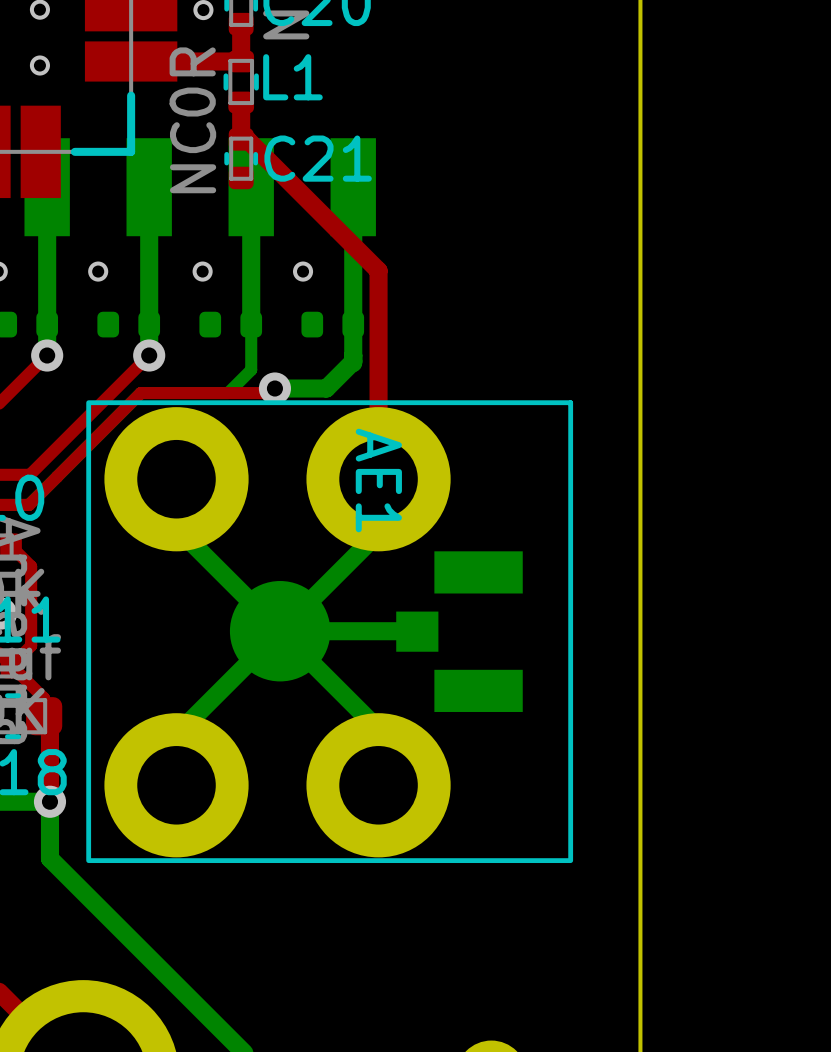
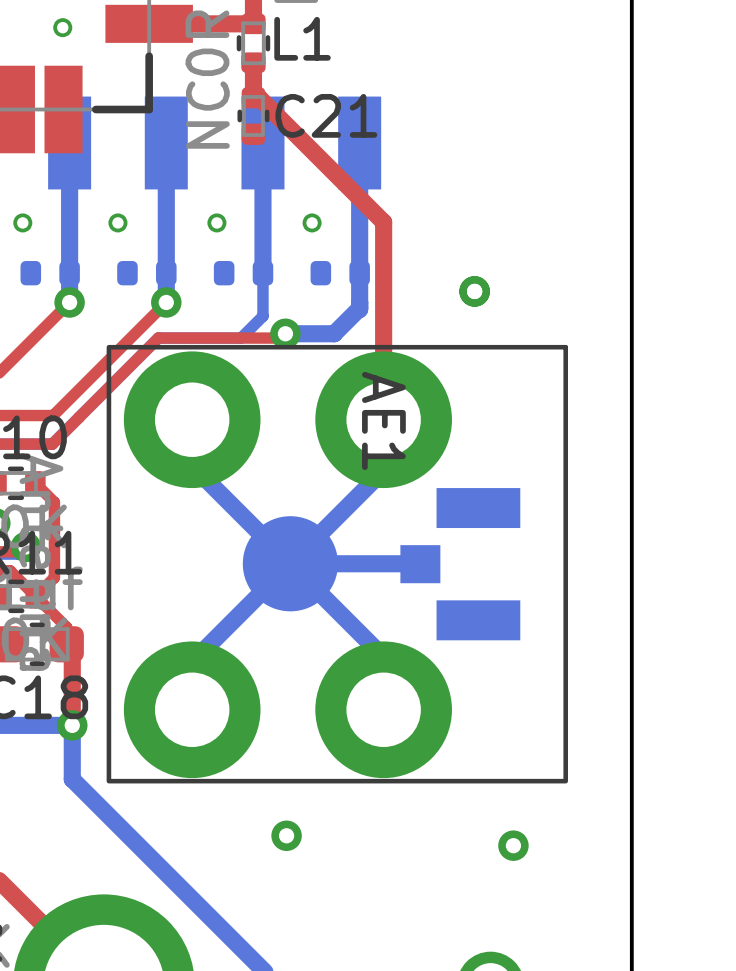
via: none -> (474, 291)
via: none -> (286, 835)
via: none -> (513, 845)

